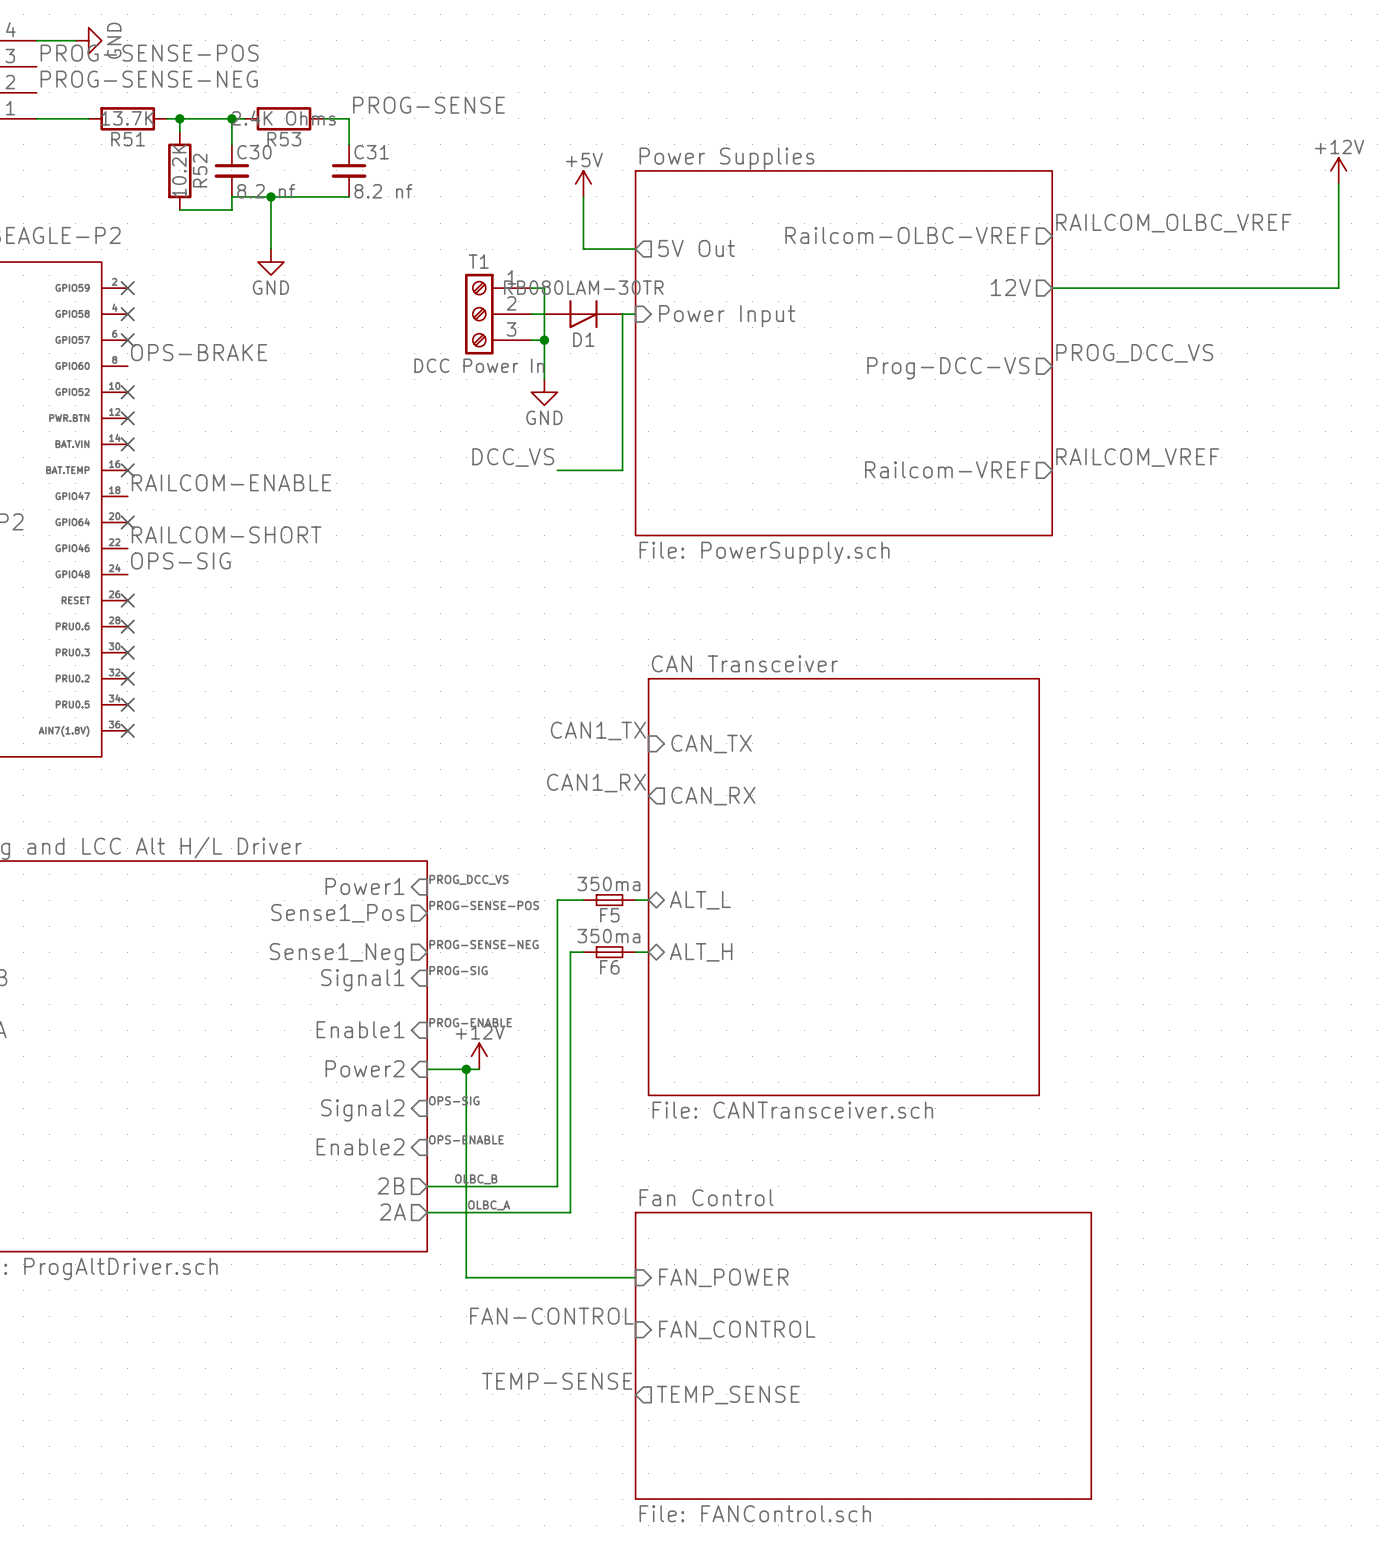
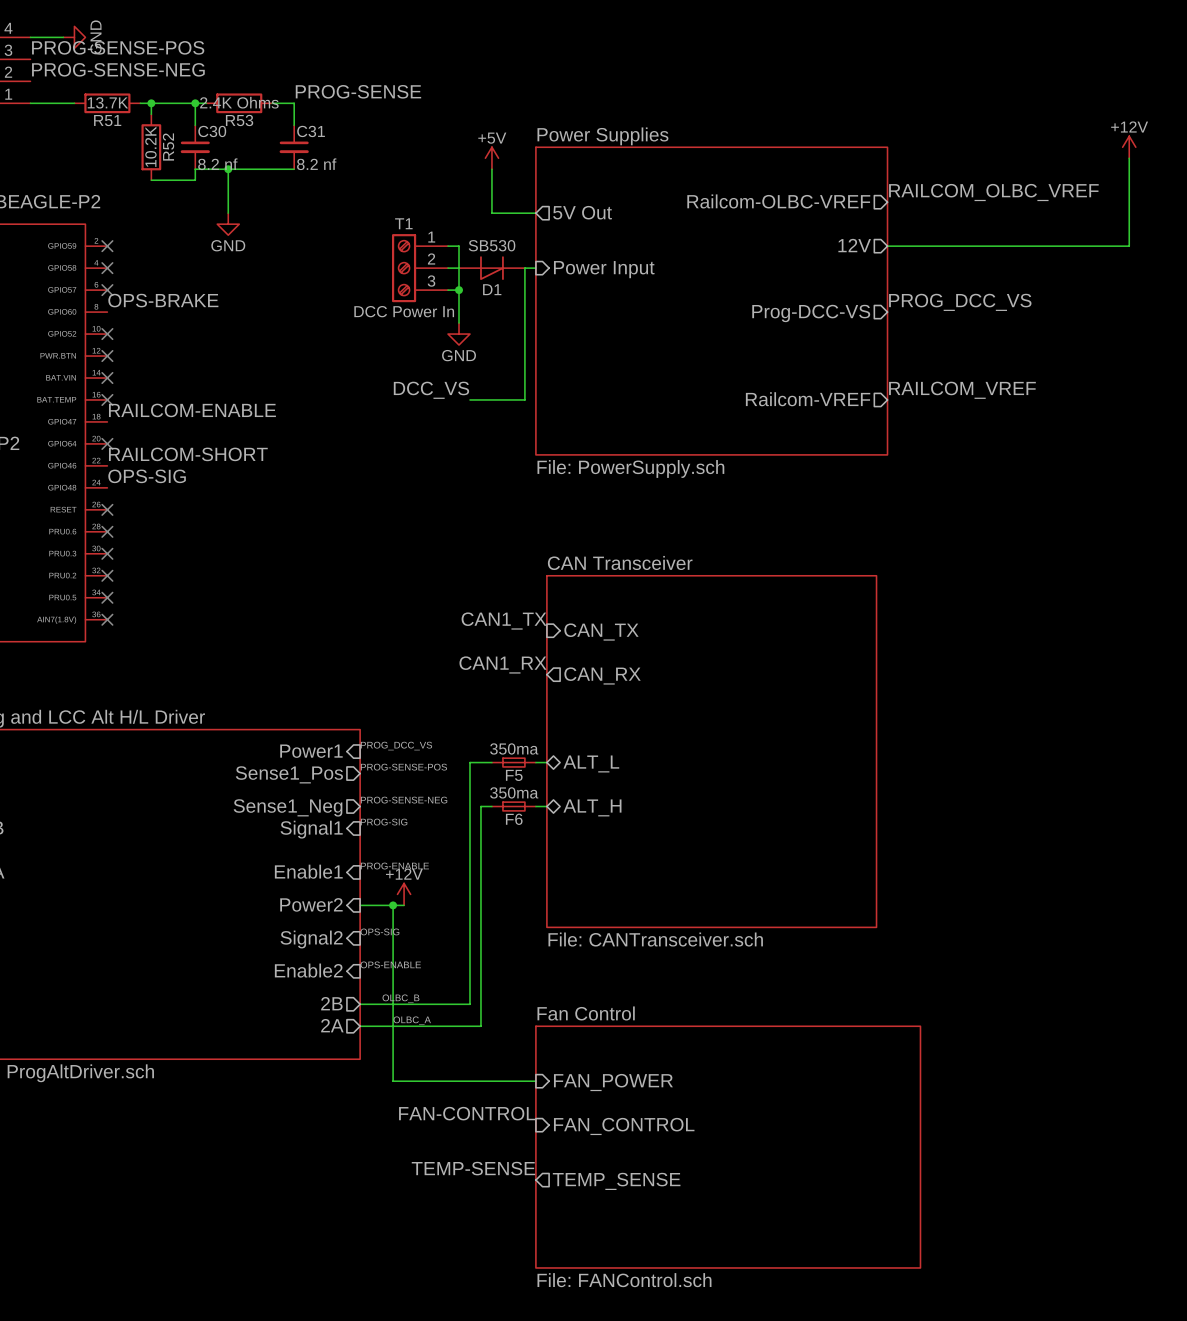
D1 value: RB080LAM-30TR (583, 287) -> SB530 (492, 245)

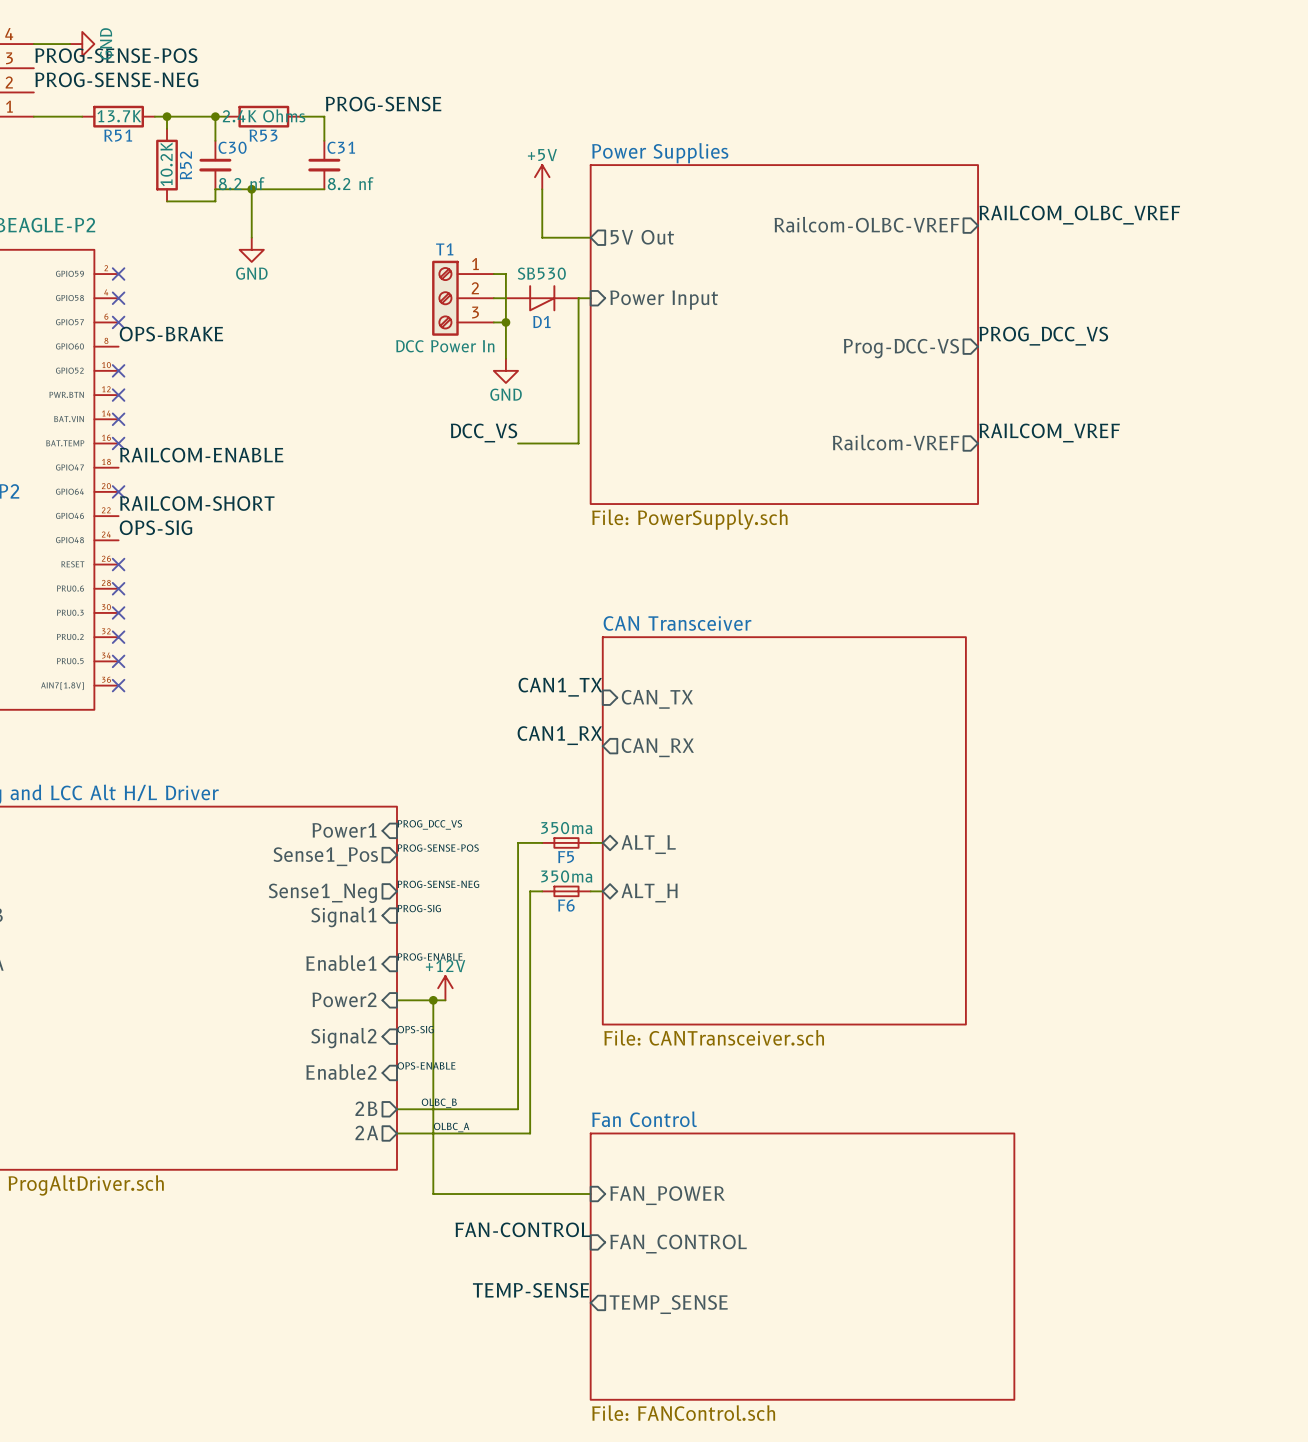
power symbol: +12V (1129, 147) -> none
wire: (1129, 158) (1129, 246) (887, 246) -> none
sheet pin: 12V (854, 245) -> none

